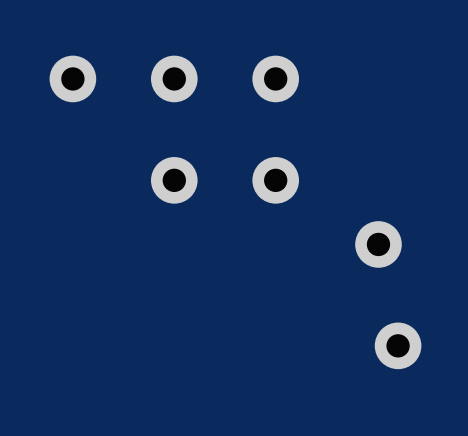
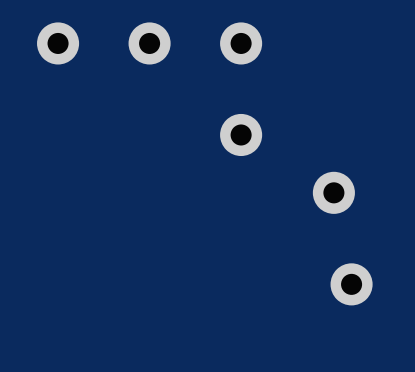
part: (174, 180) -> none

